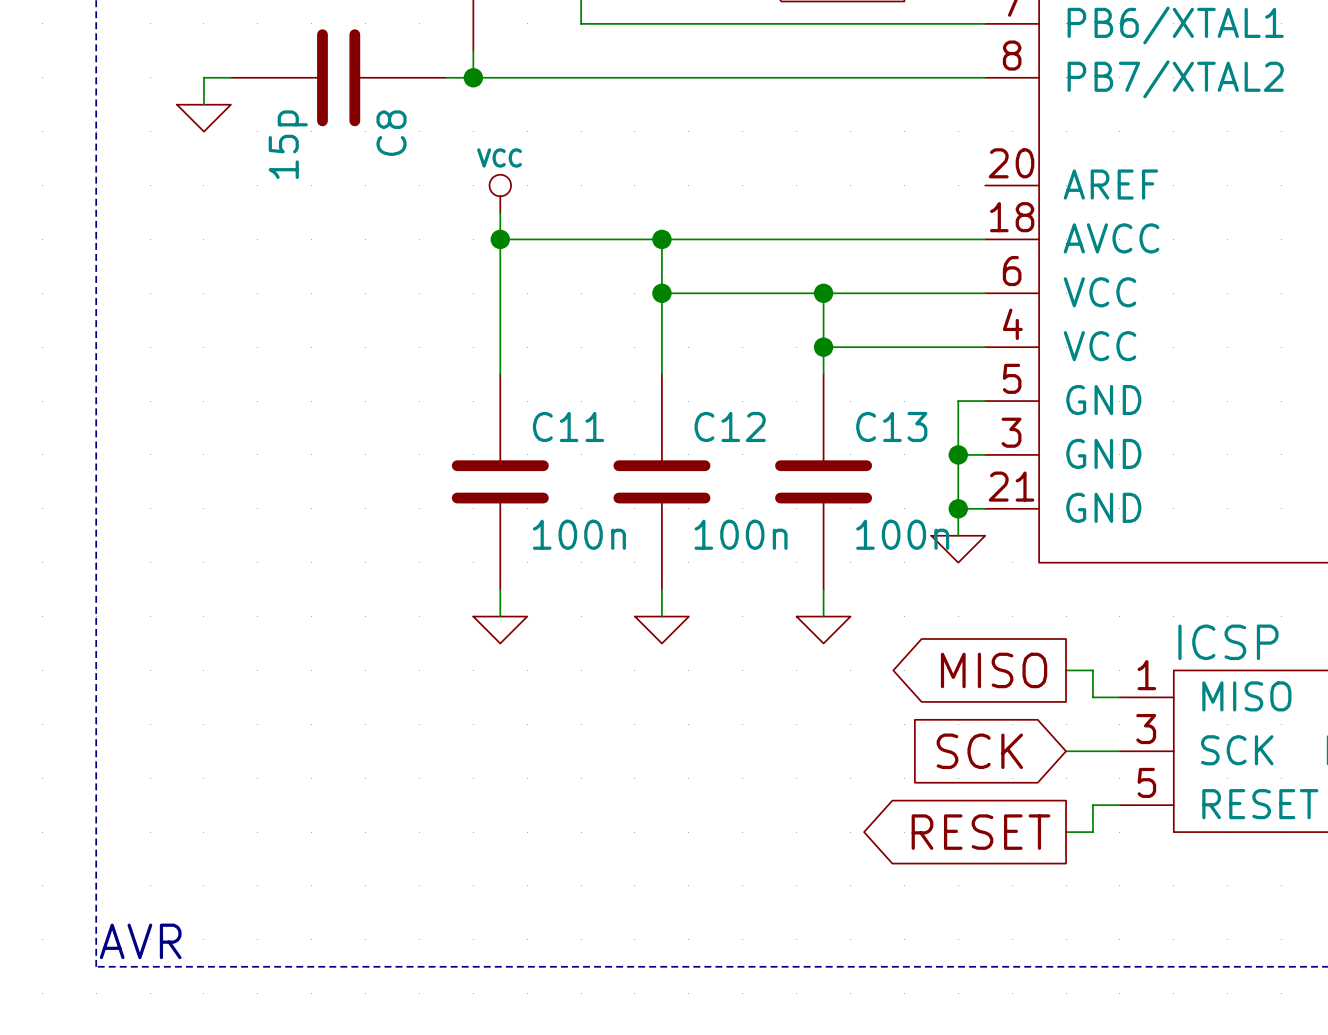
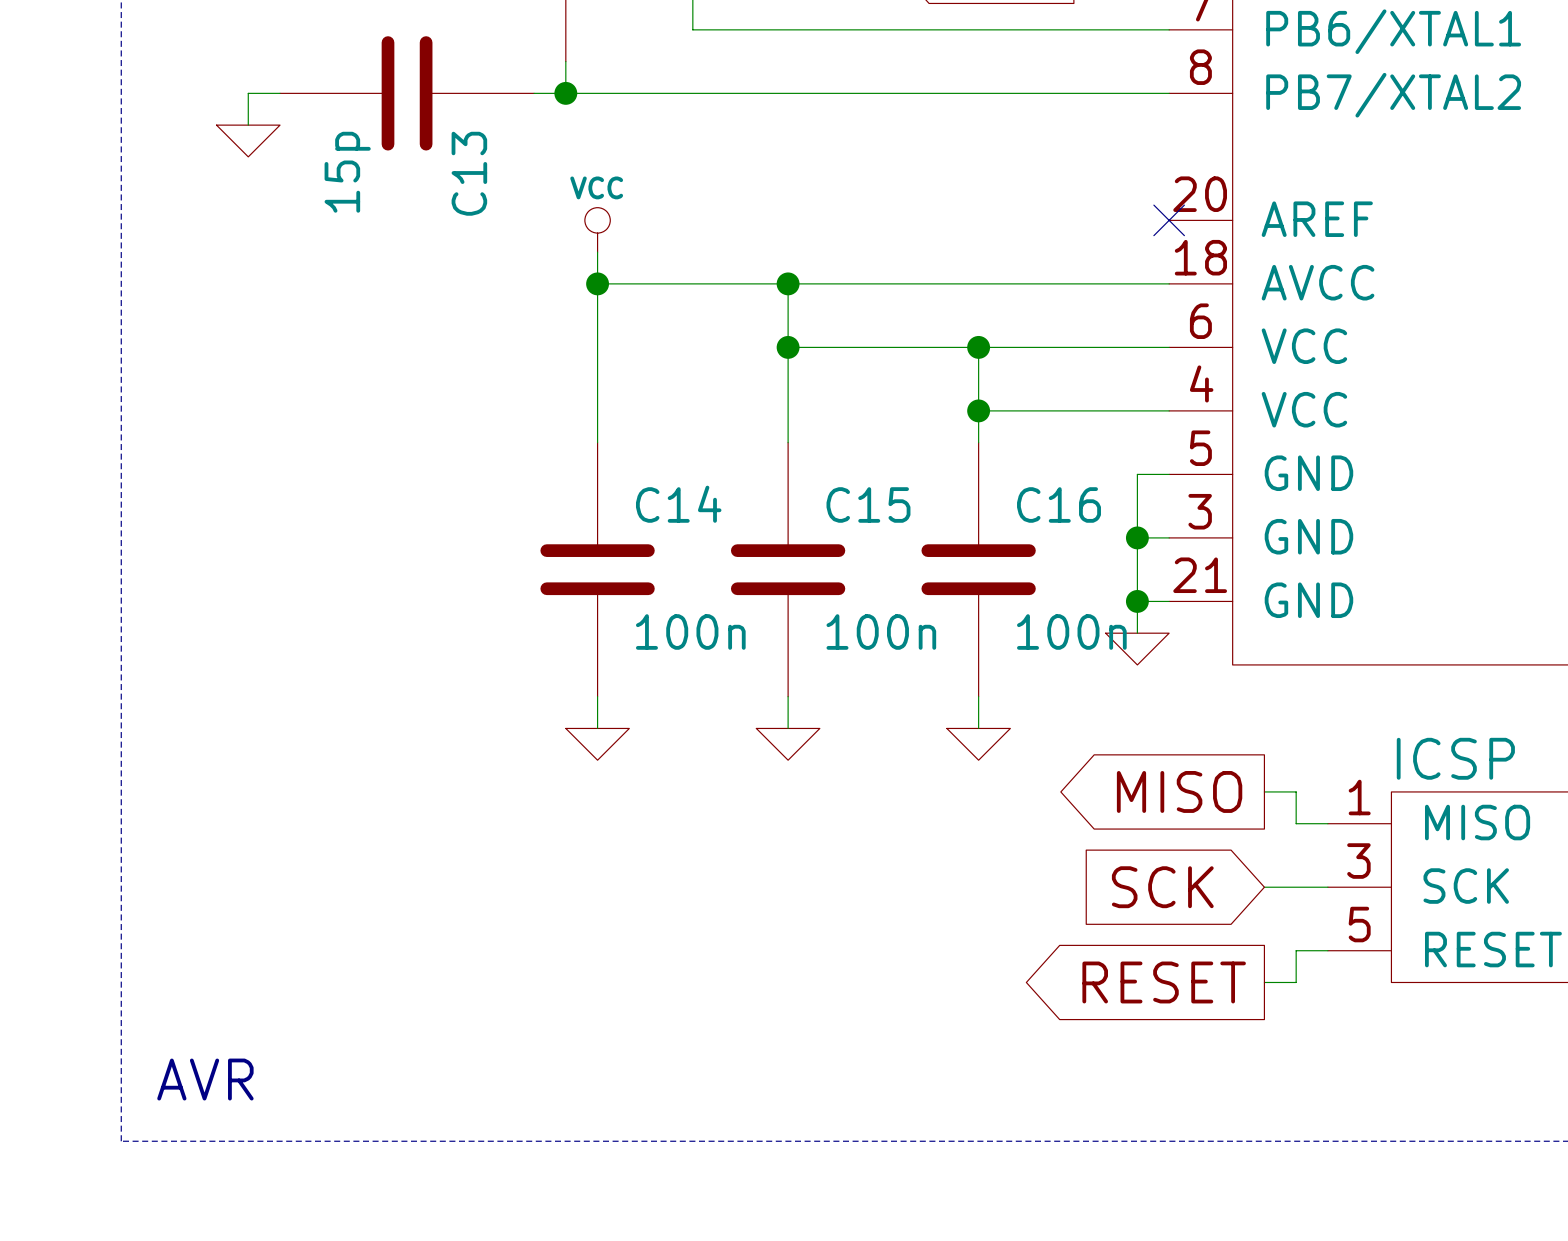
C8 name: C8 (391, 133) -> C13 (469, 173)
no-connect mark: none -> (1169, 220)
C11 name: C11 (568, 426) -> C14 (678, 504)
C12 name: C12 (730, 426) -> C15 (868, 504)
C13 name: C13 (891, 426) -> C16 (1059, 504)
text position: AVR (140, 941) -> AVR (205, 1079)

